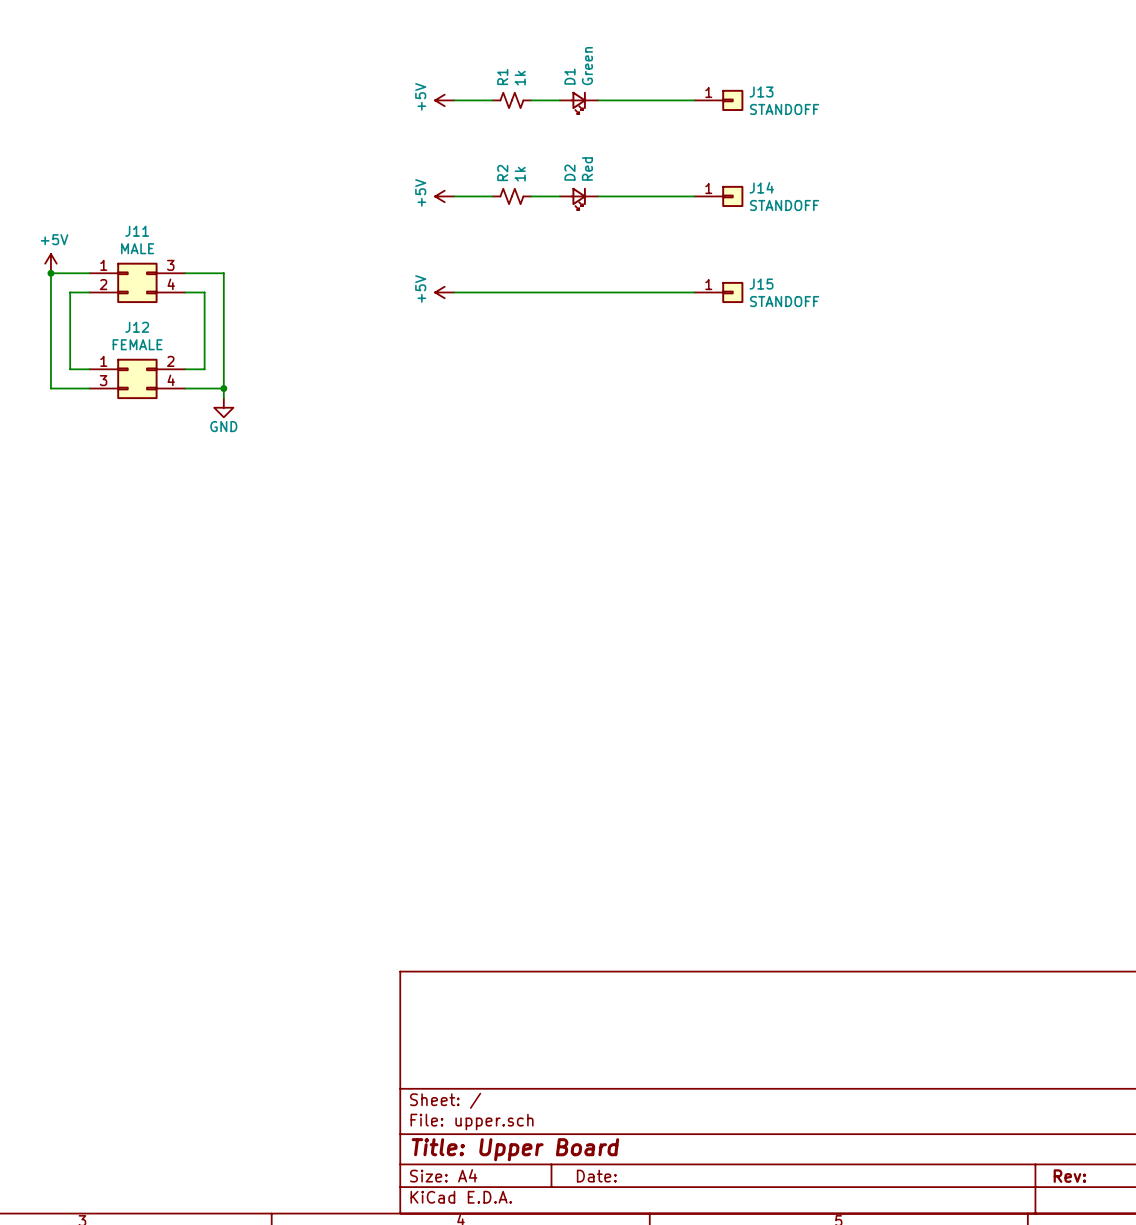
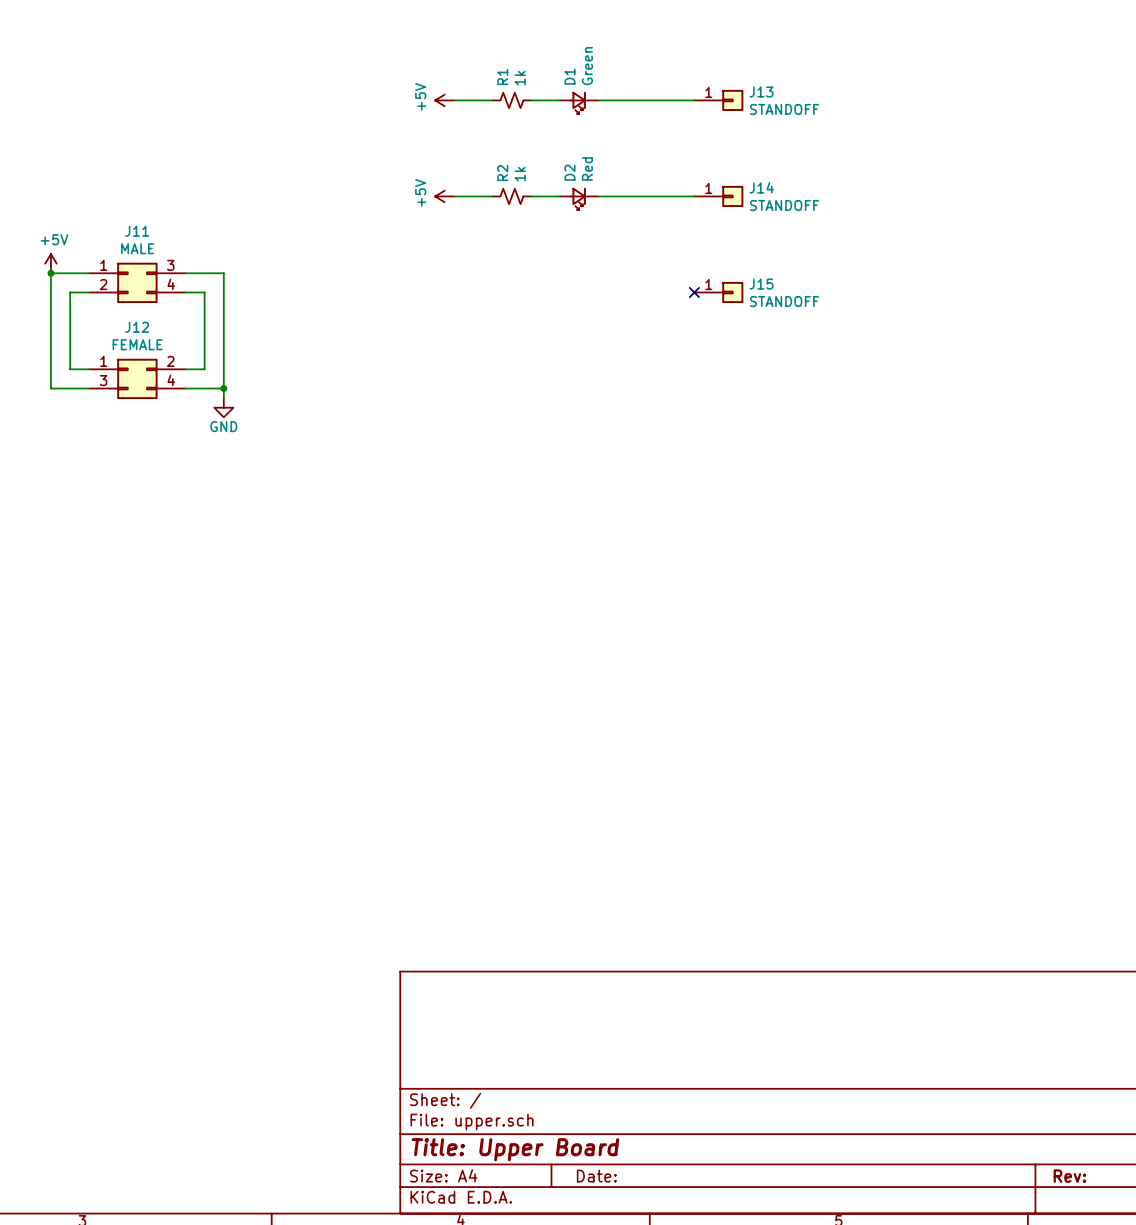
power symbol: +5V (444, 292) -> none
wire: (454, 292) (694, 292) -> none
no-connect mark: none -> (694, 292)

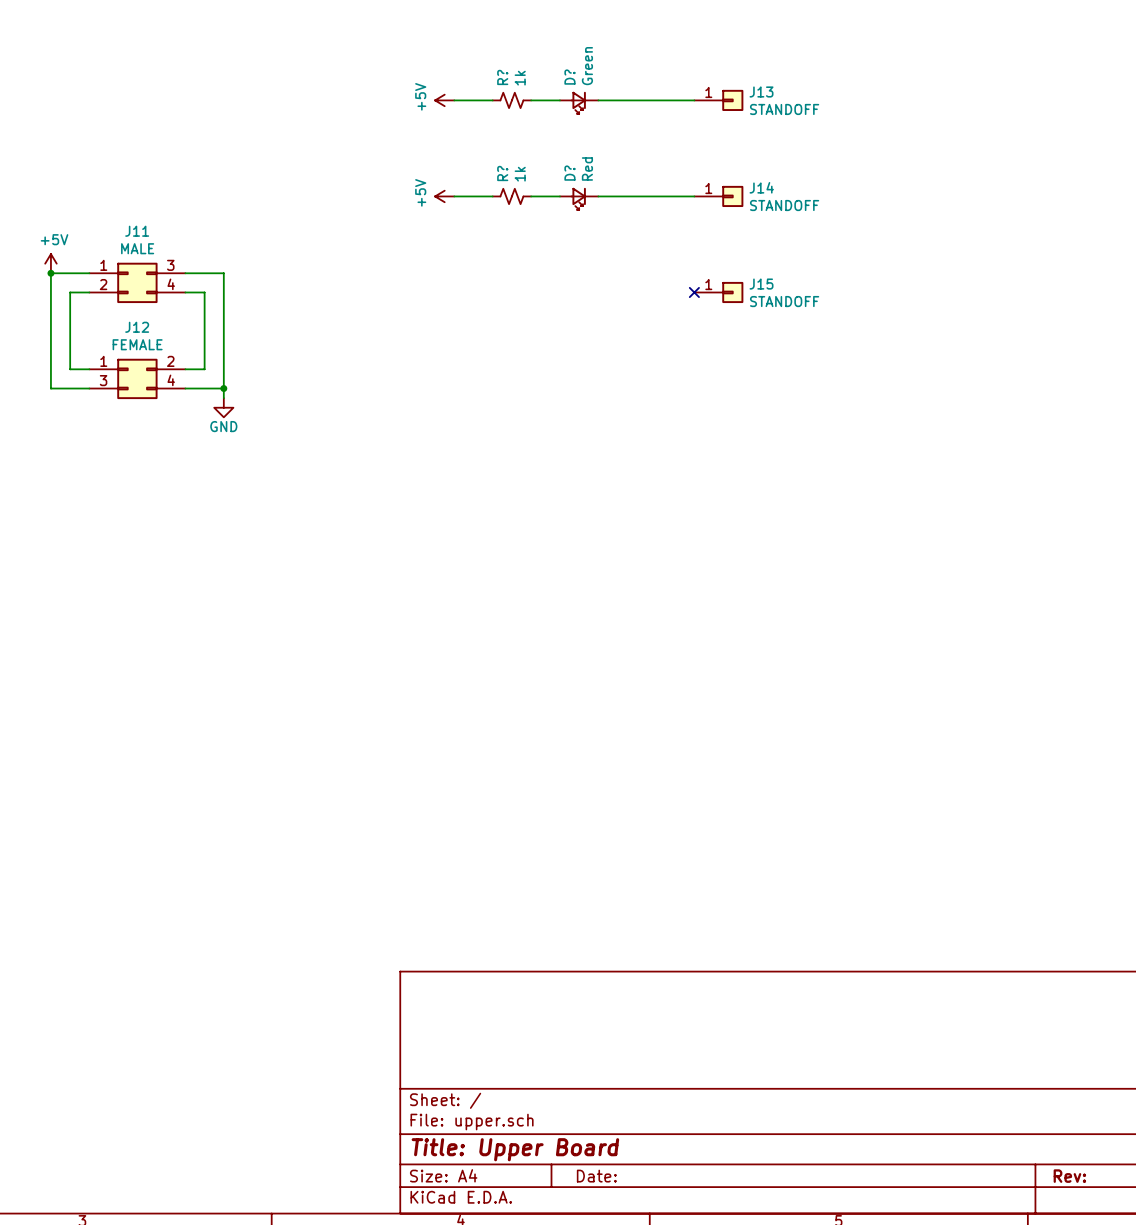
R1 name: R1 (502, 76) -> R? (502, 77)
D1 name: D1 (569, 76) -> D? (569, 77)
D2 name: D2 (569, 172) -> D? (569, 173)
R2 name: R2 (502, 173) -> R? (502, 173)

